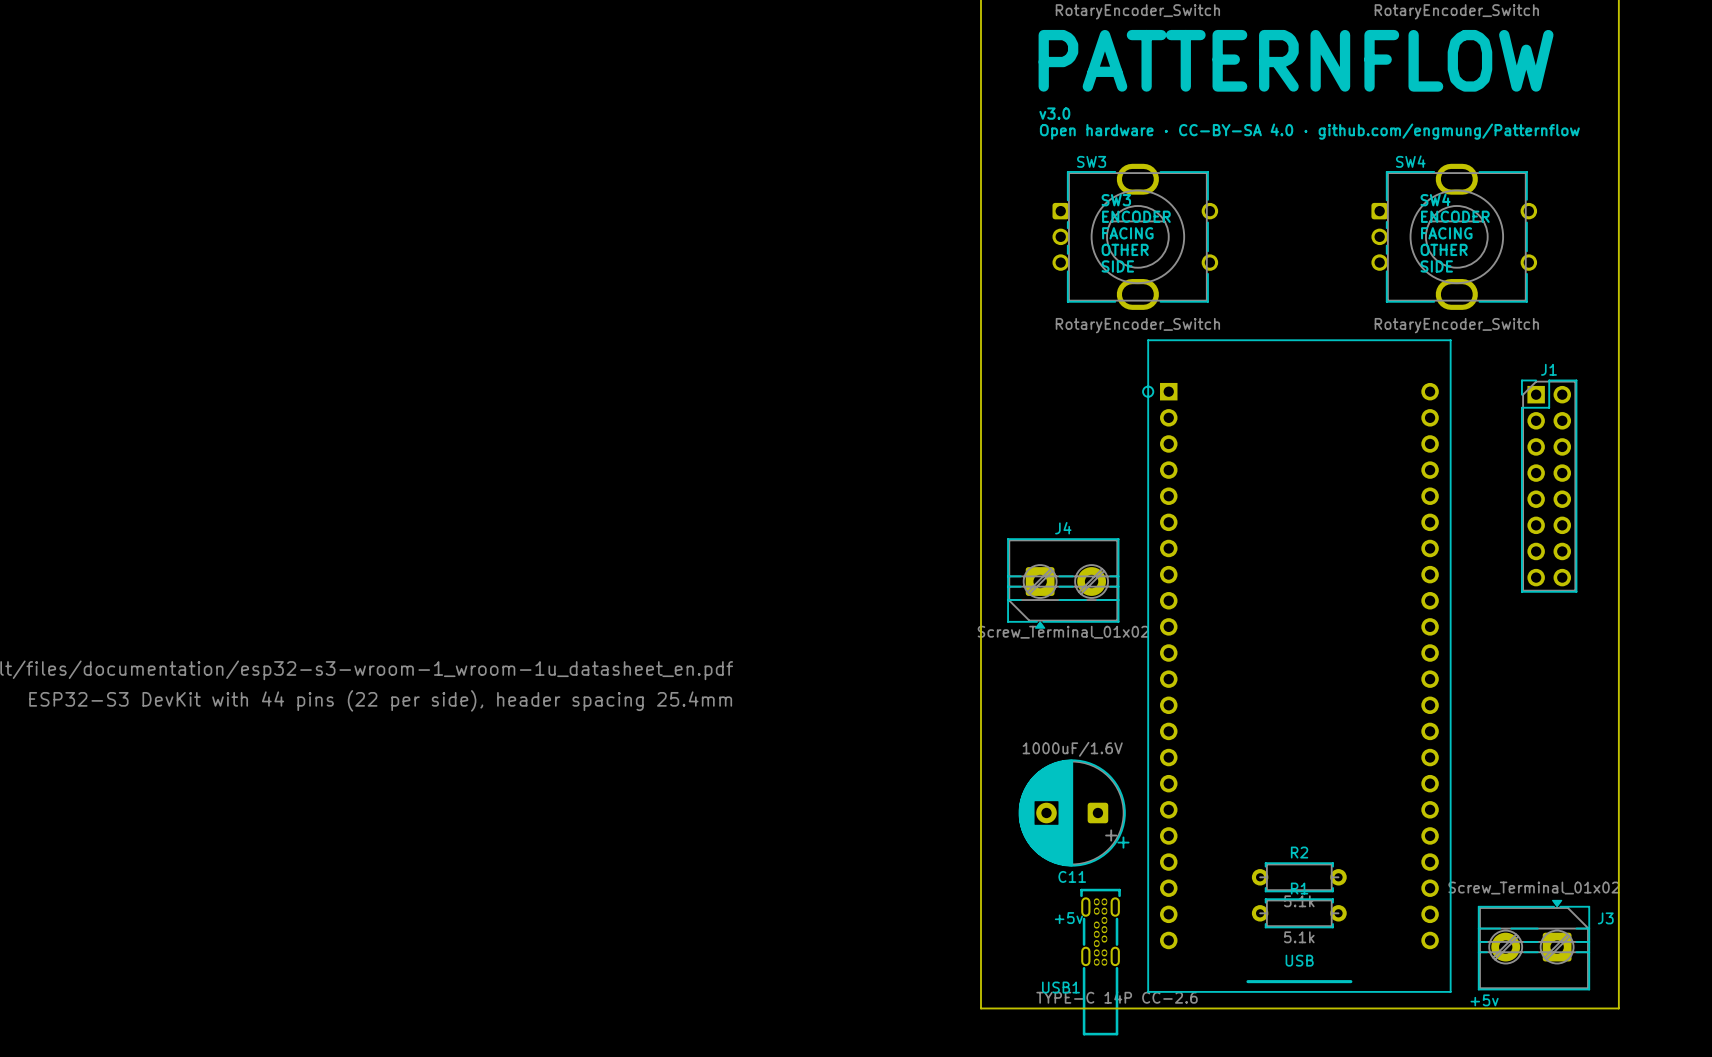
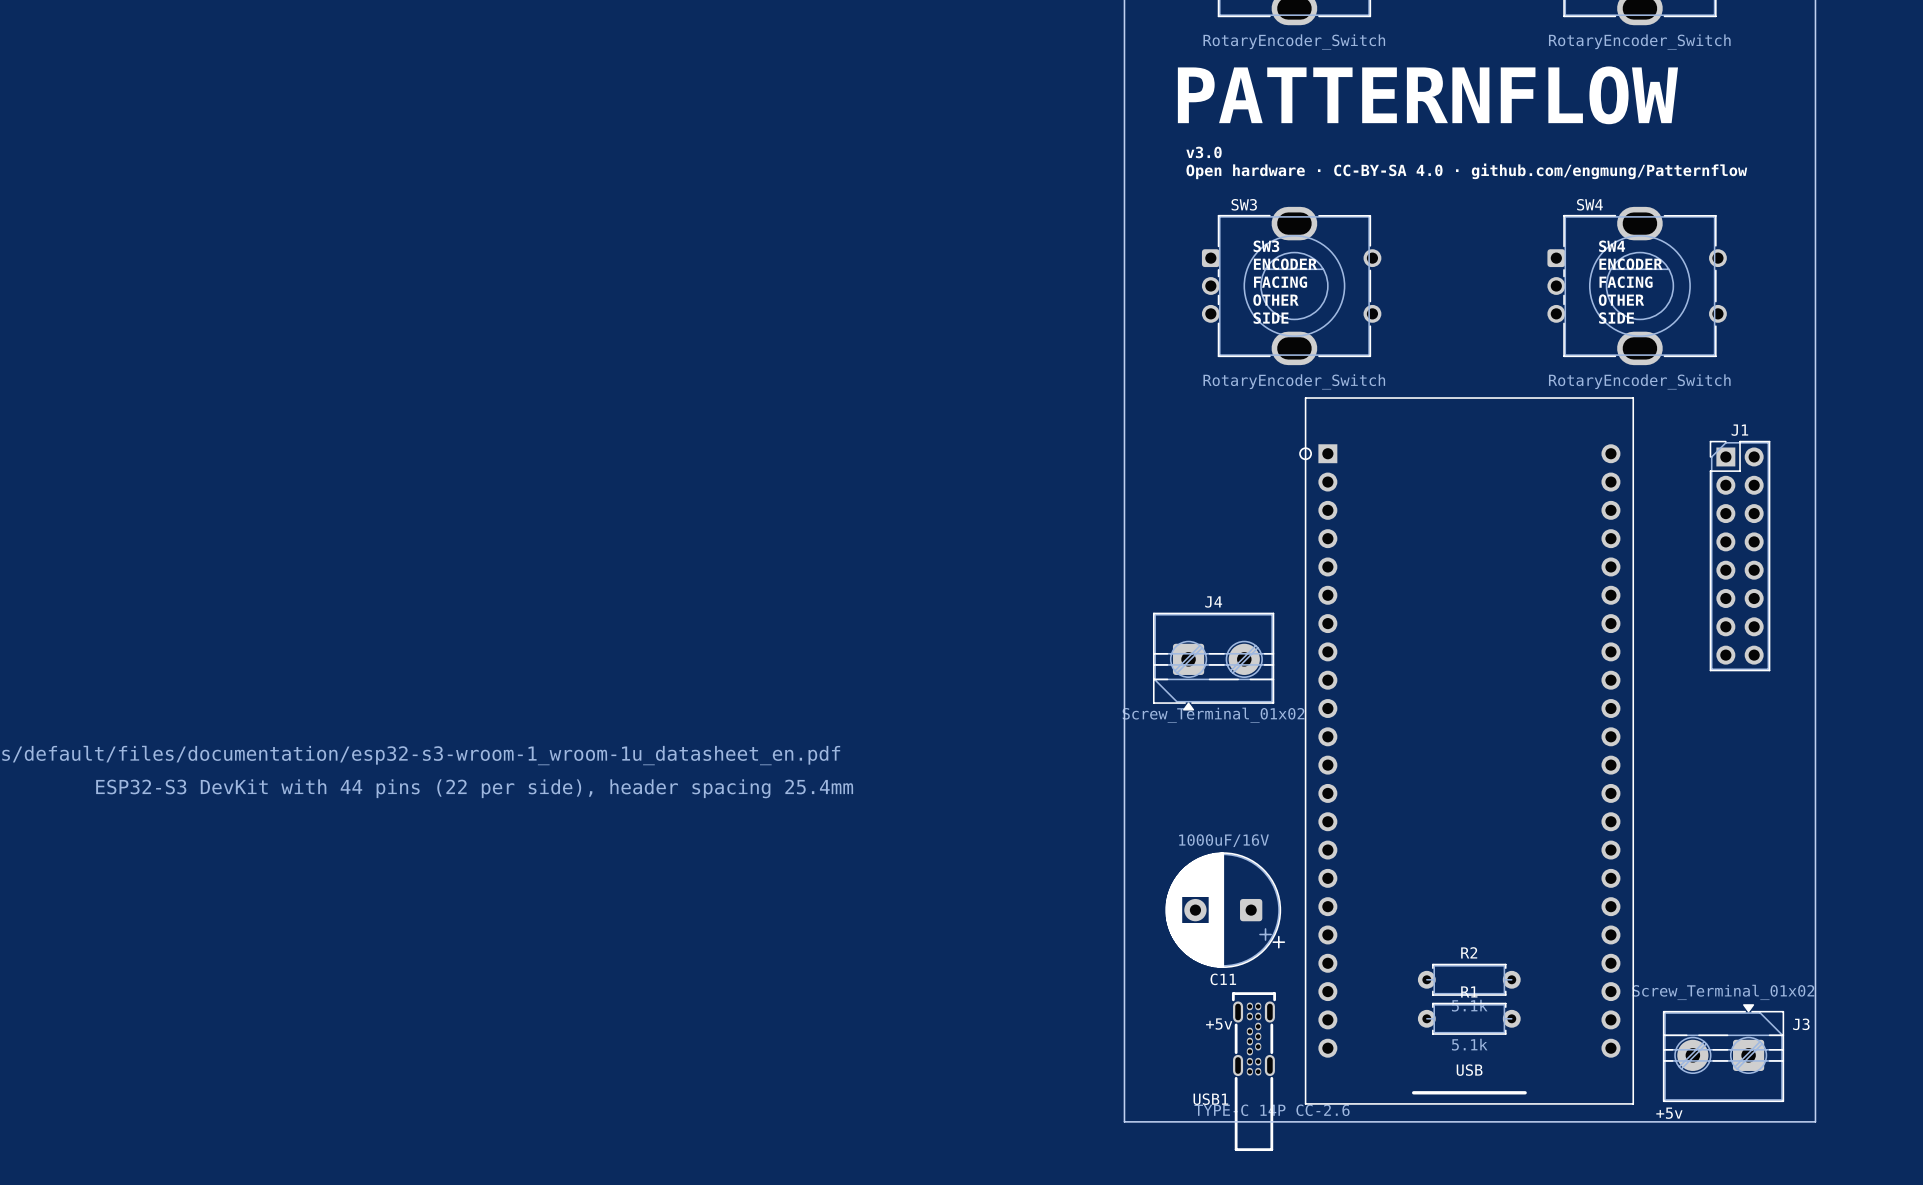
C11 value: 1000uF/1.6V (1072, 749) -> 1000uF/16V (1224, 840)

